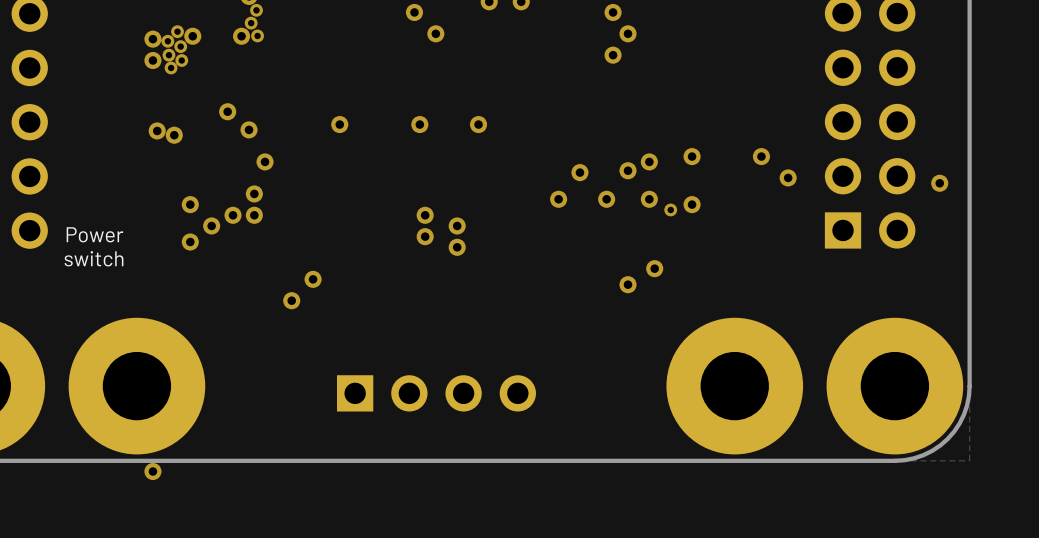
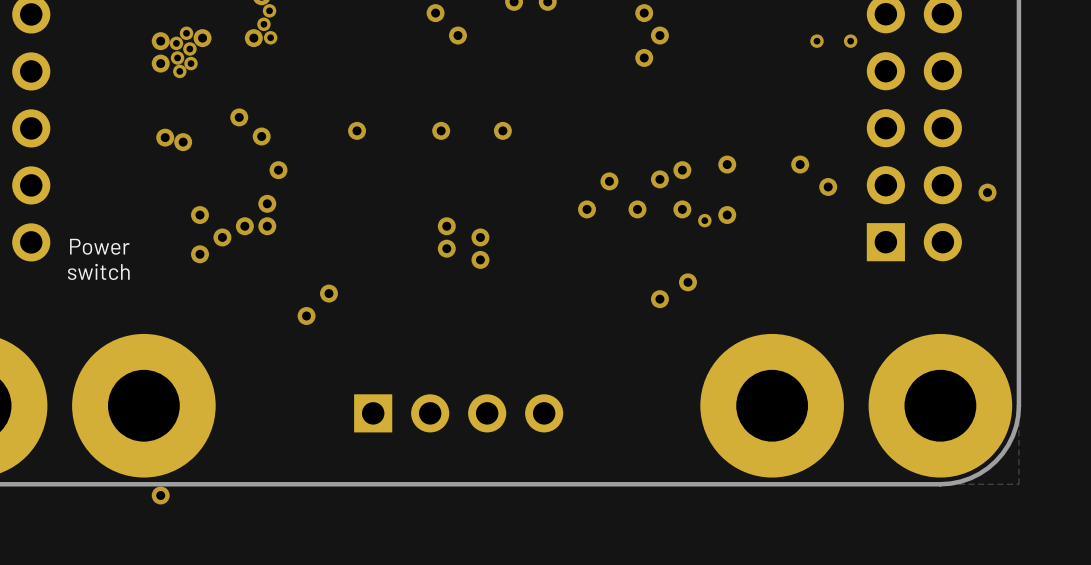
via: none -> (817, 41)
via: none -> (850, 41)

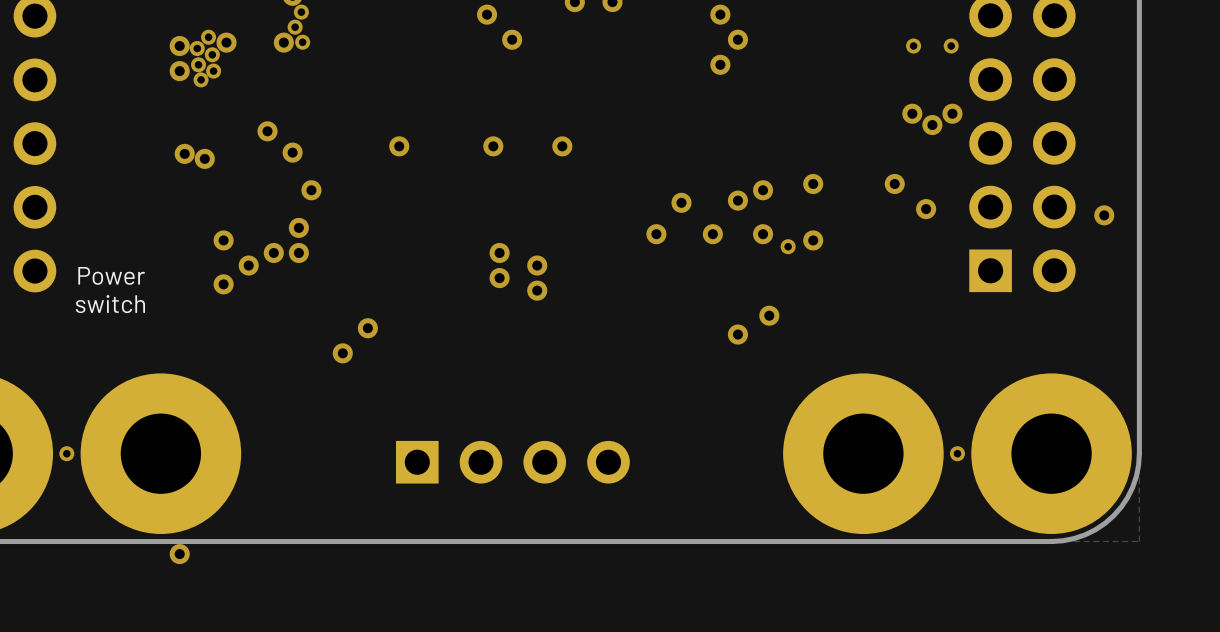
via: none -> (912, 113)
via: none -> (952, 113)
via: none -> (932, 125)
via: none -> (66, 453)
via: none -> (957, 453)

